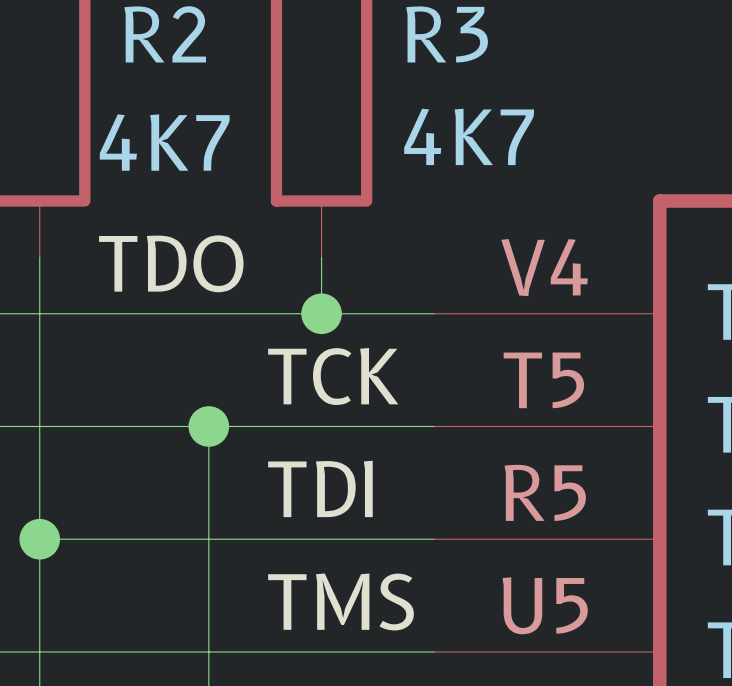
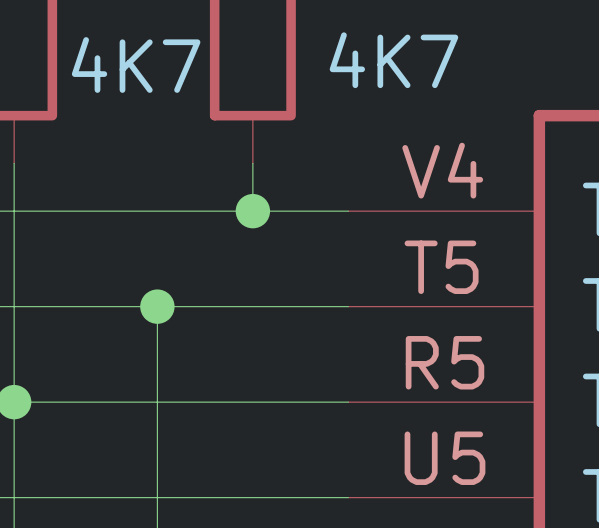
label: TDO (171, 263) -> none
label: TCK (333, 376) -> none
label: TDI (320, 488) -> none
label: TMS (341, 601) -> none

